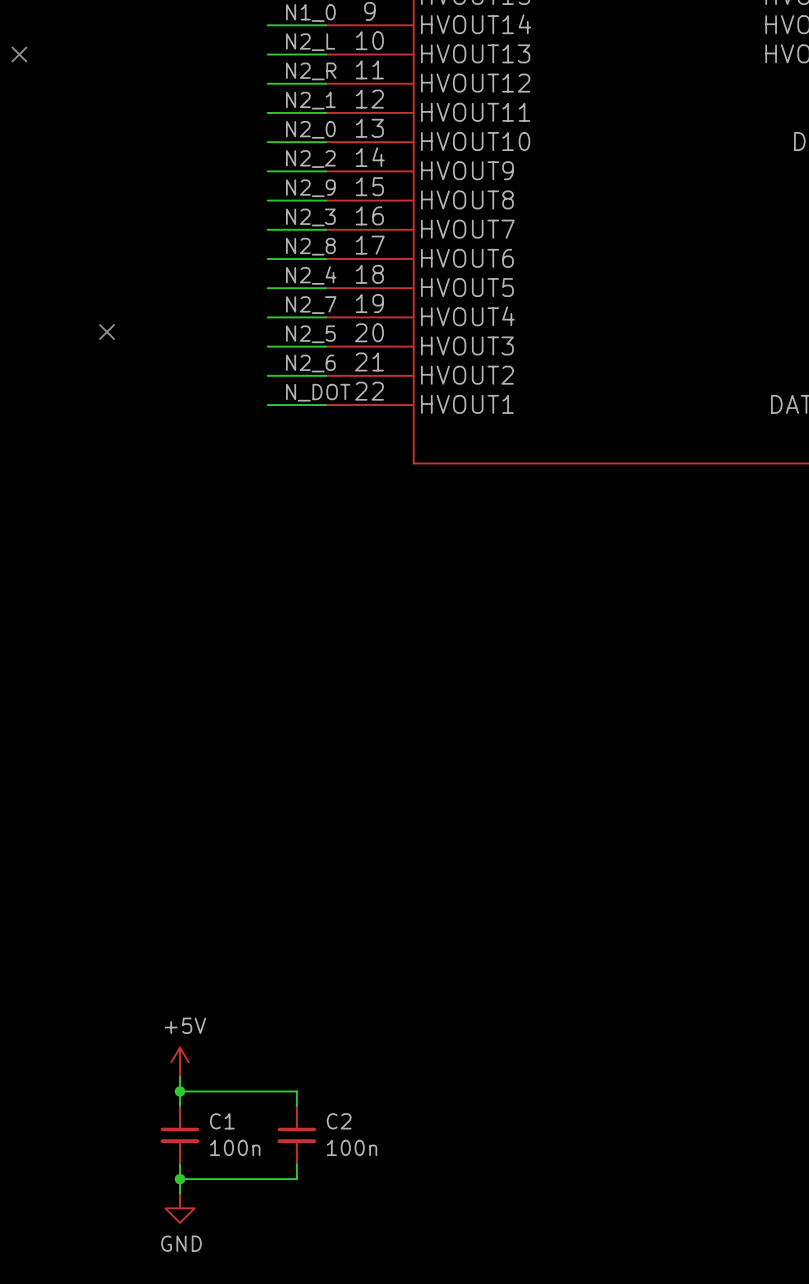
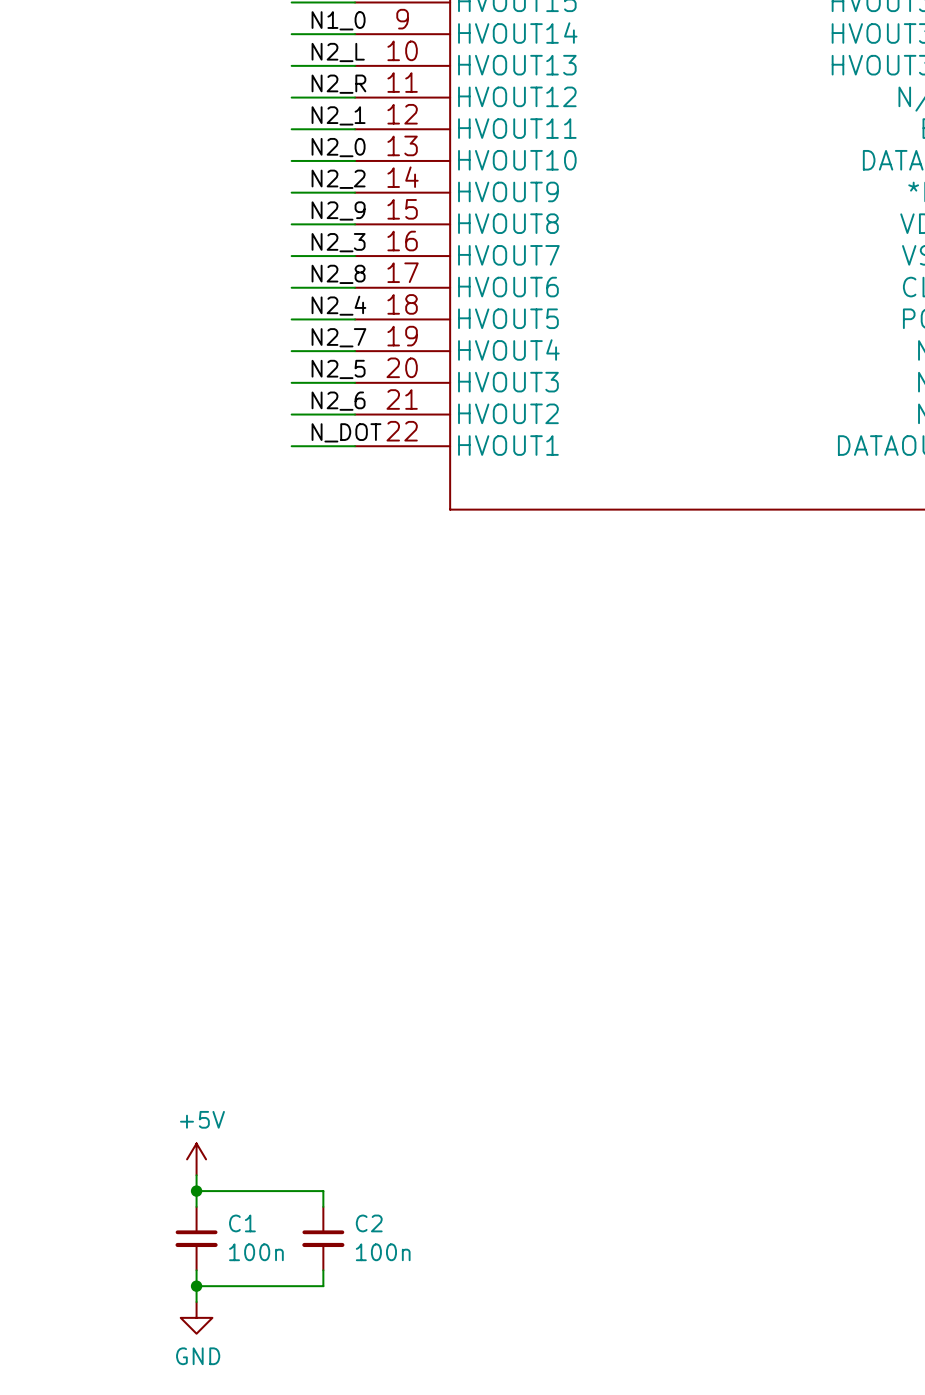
no-connect mark: (19, 54) -> none
no-connect mark: (107, 332) -> none

